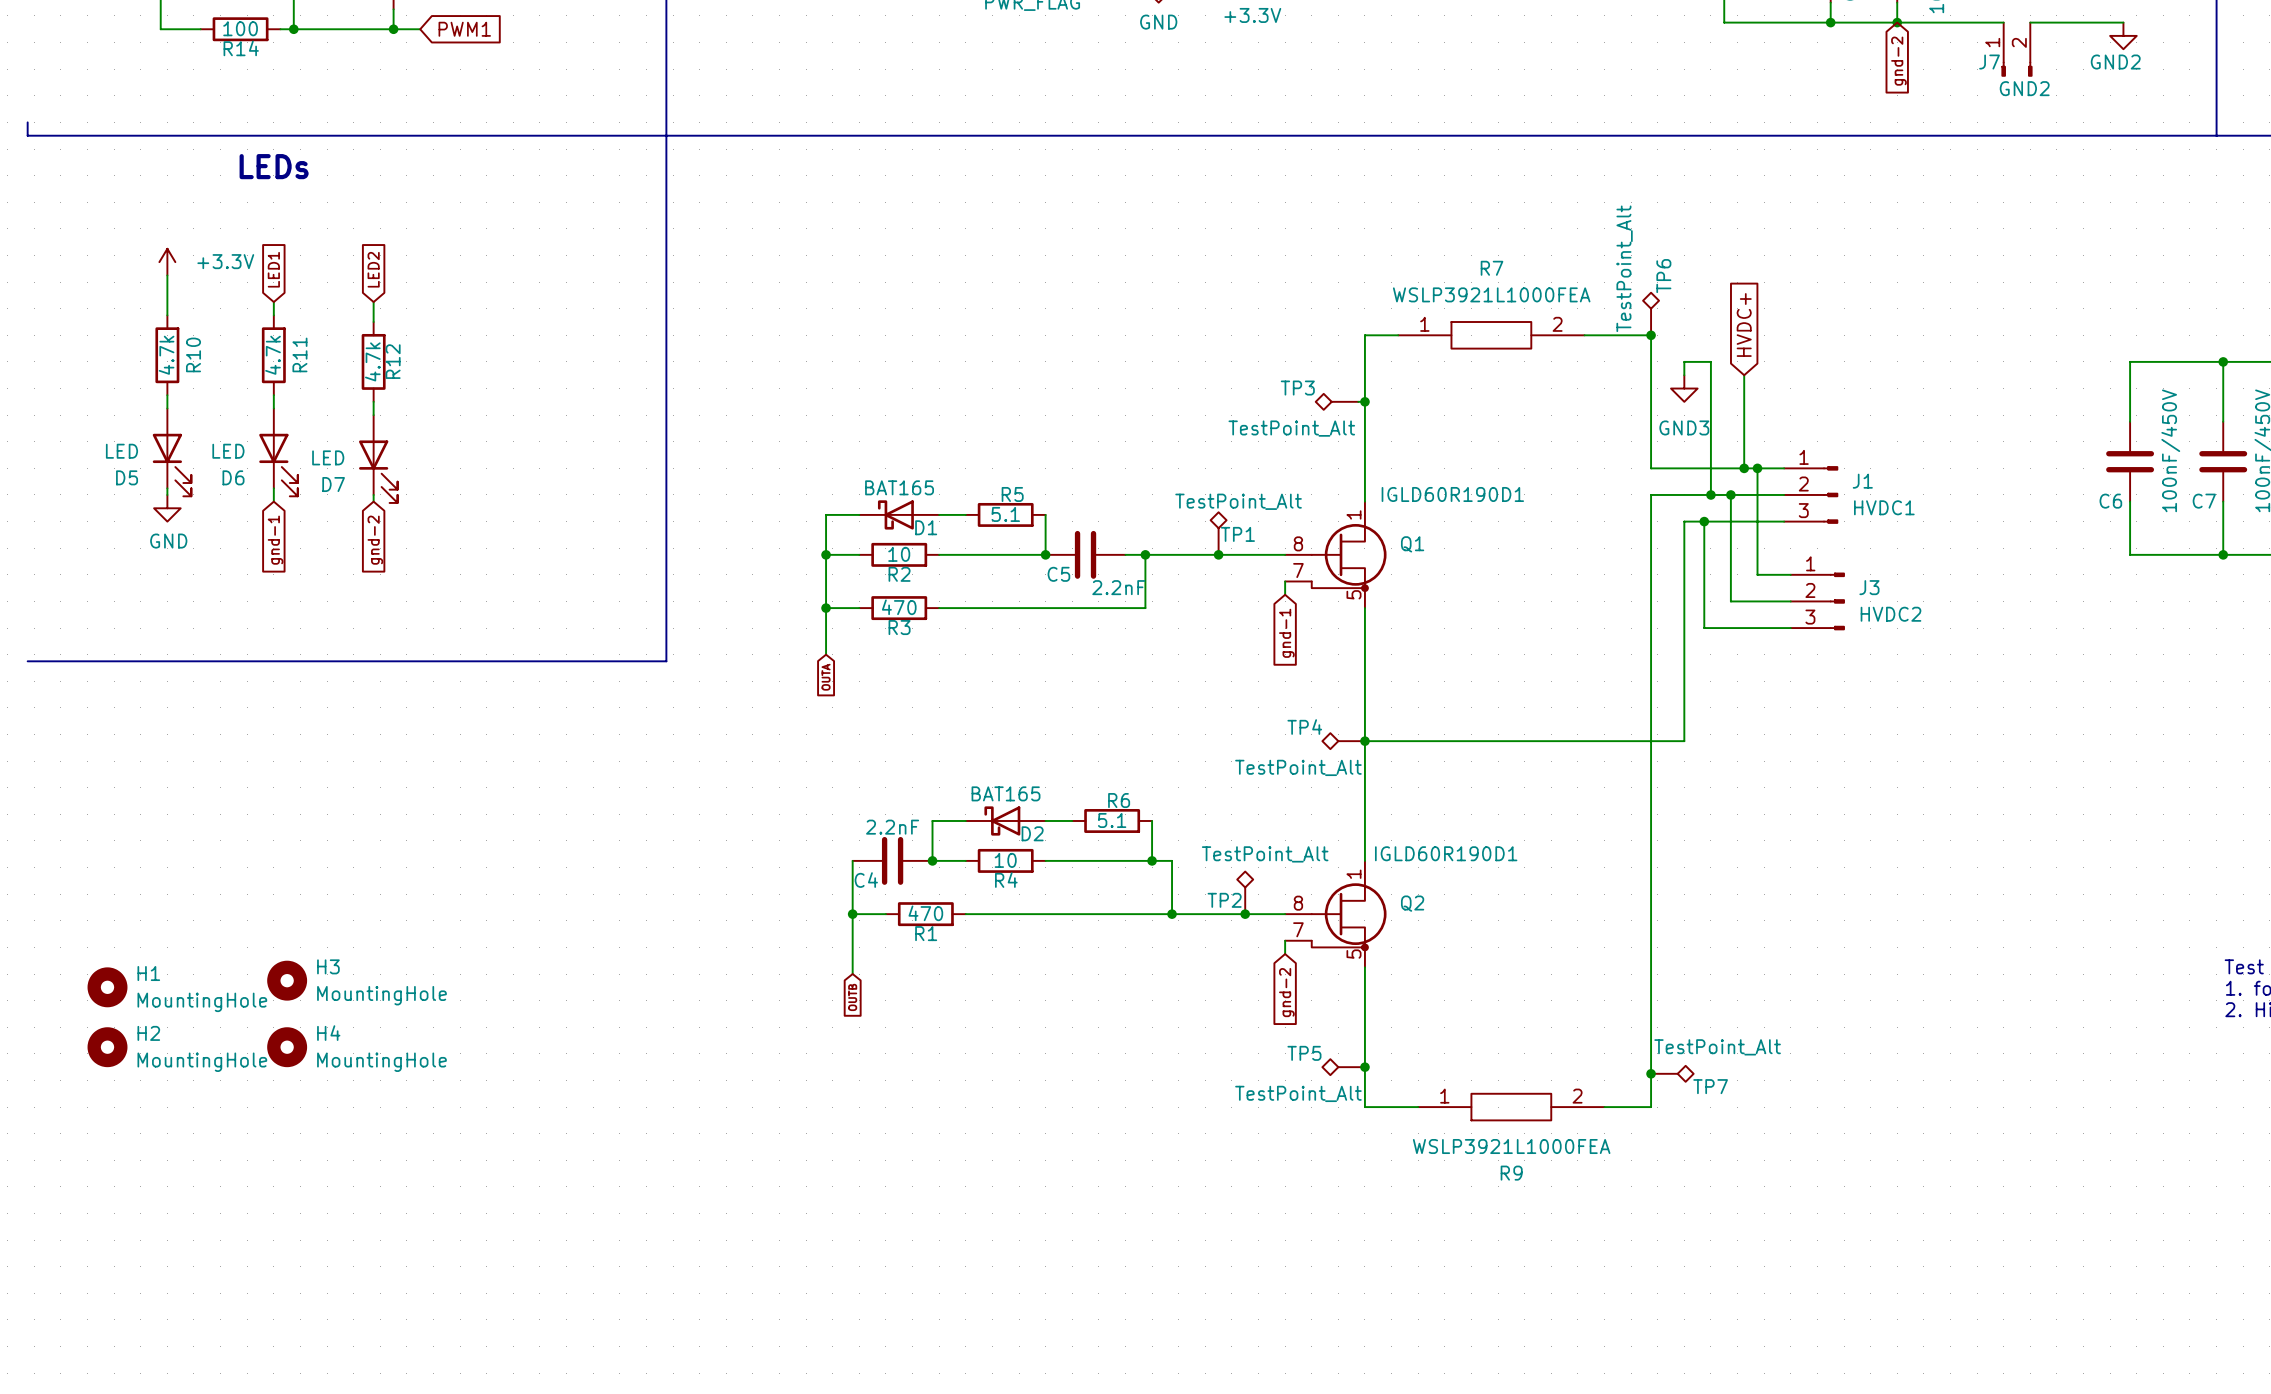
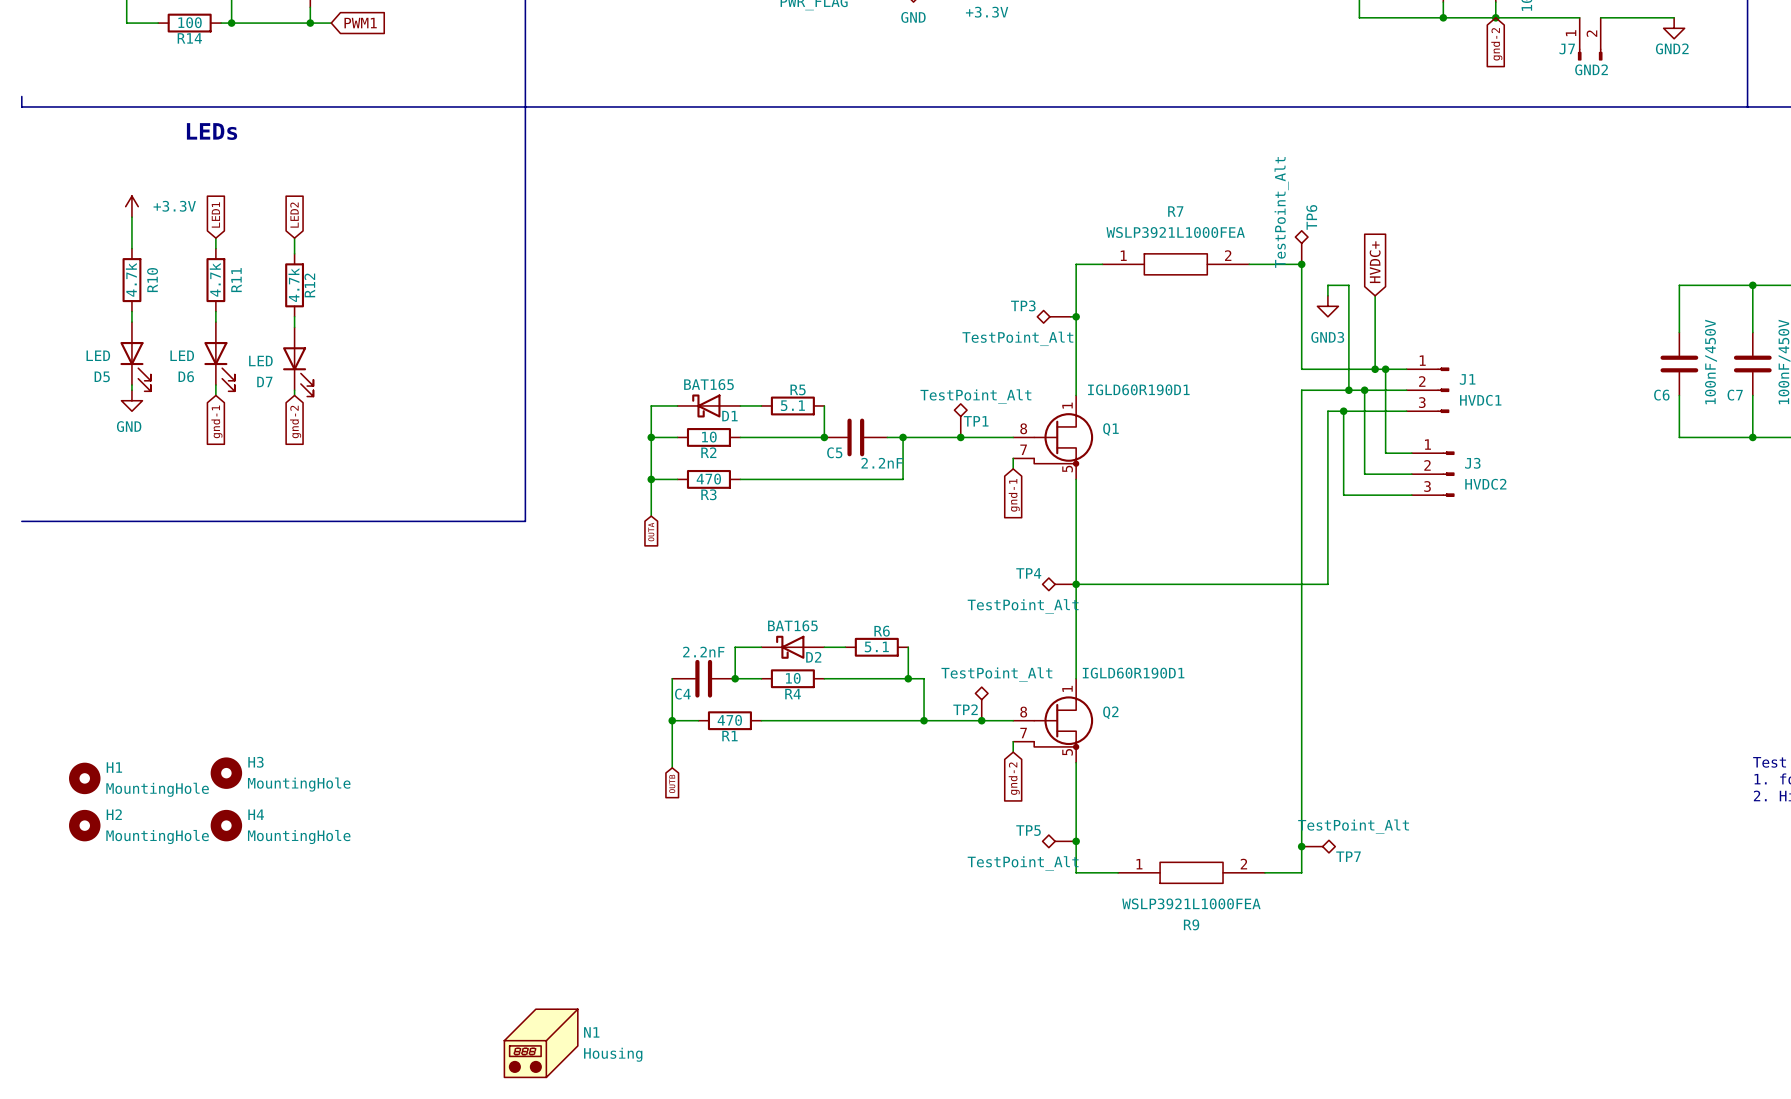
N1: none -> Housing (541, 1043)

